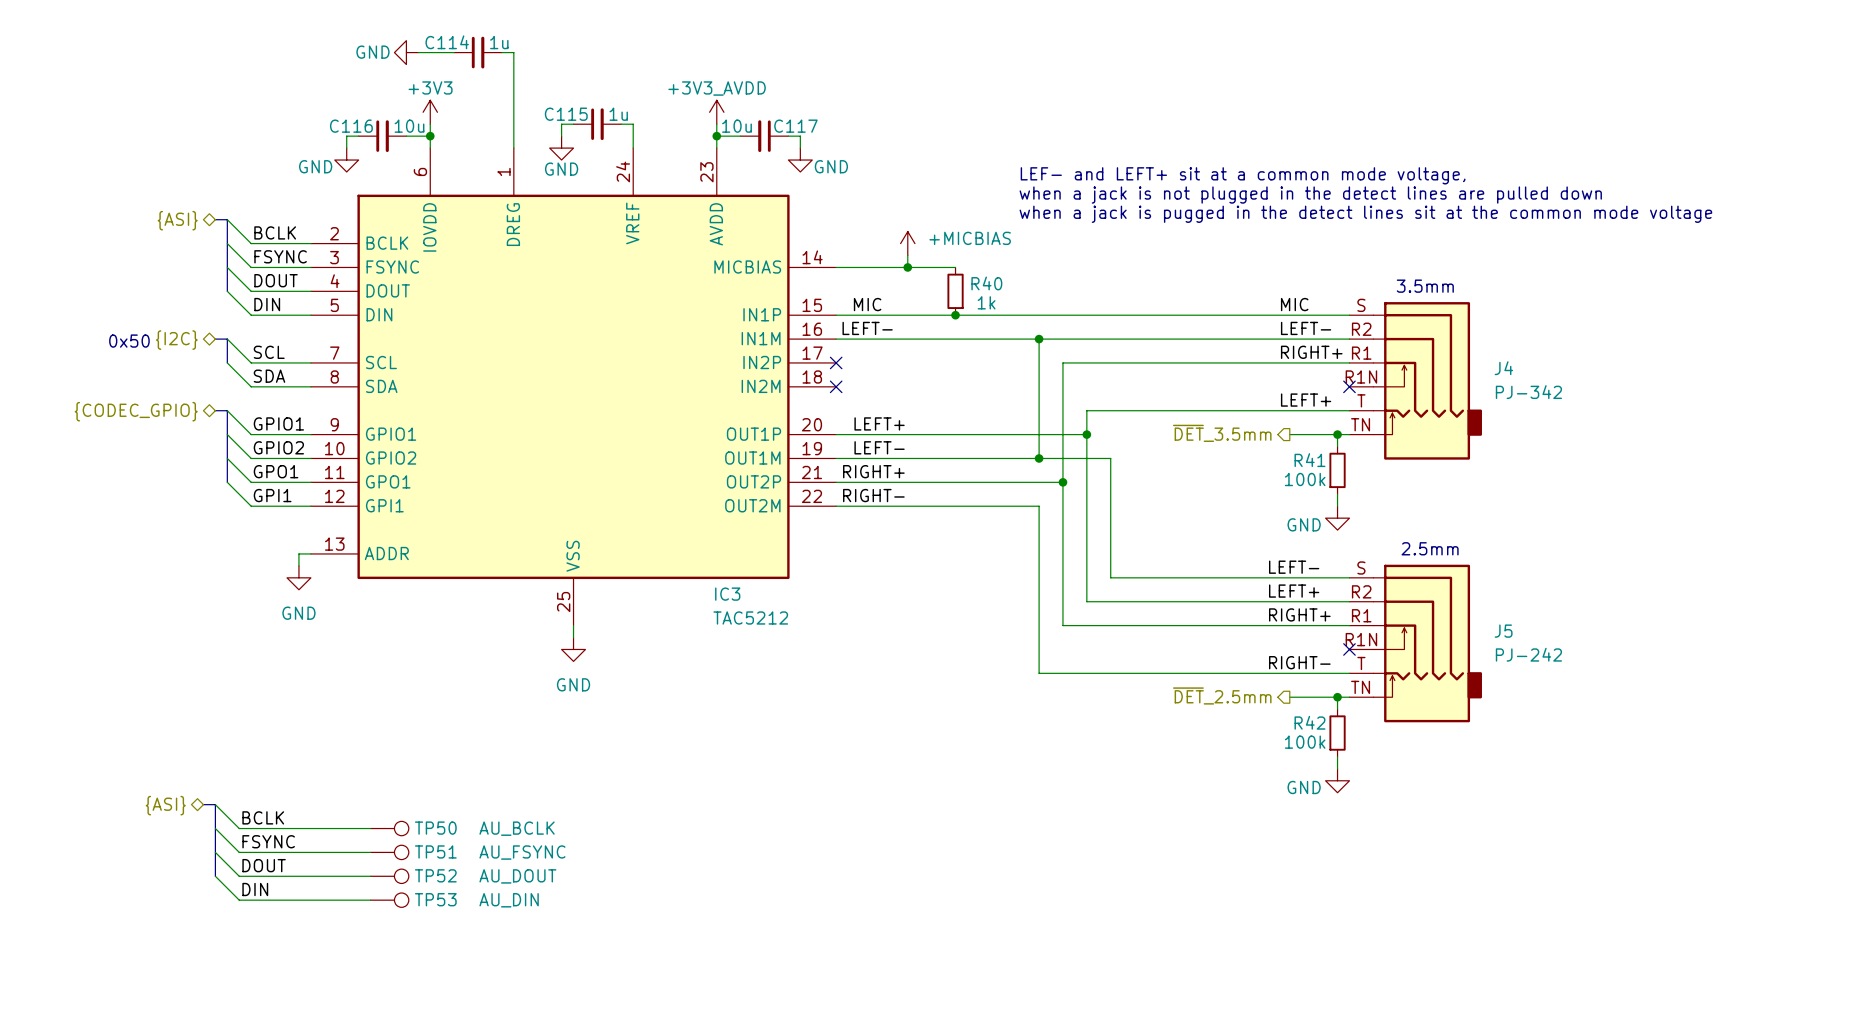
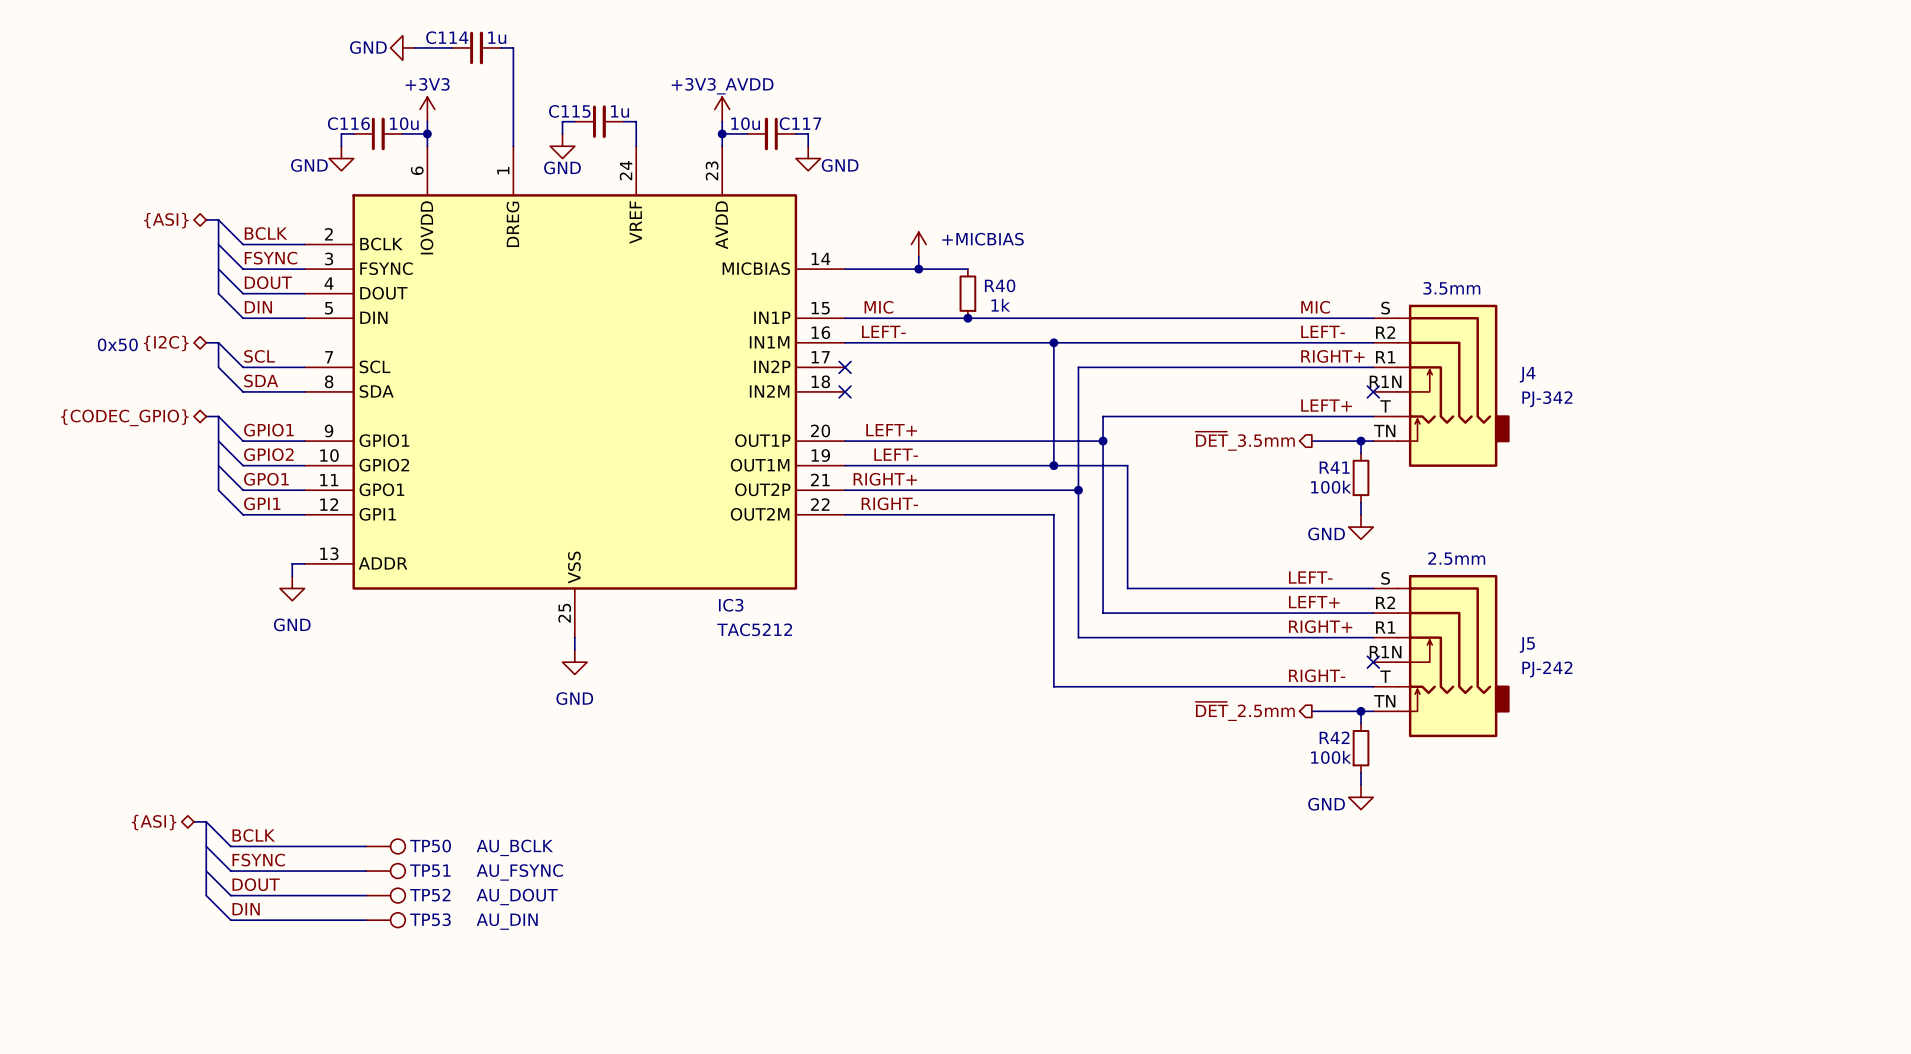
text: LEF- and LEFT+ sit at a common mode voltage, (1243, 175) -> none
text: when a jack is not plugged in the detect lines are pulled down (1310, 195) -> none
text: when a jack is pugged in the detect lines sit at the common mode voltage (1365, 214) -> none

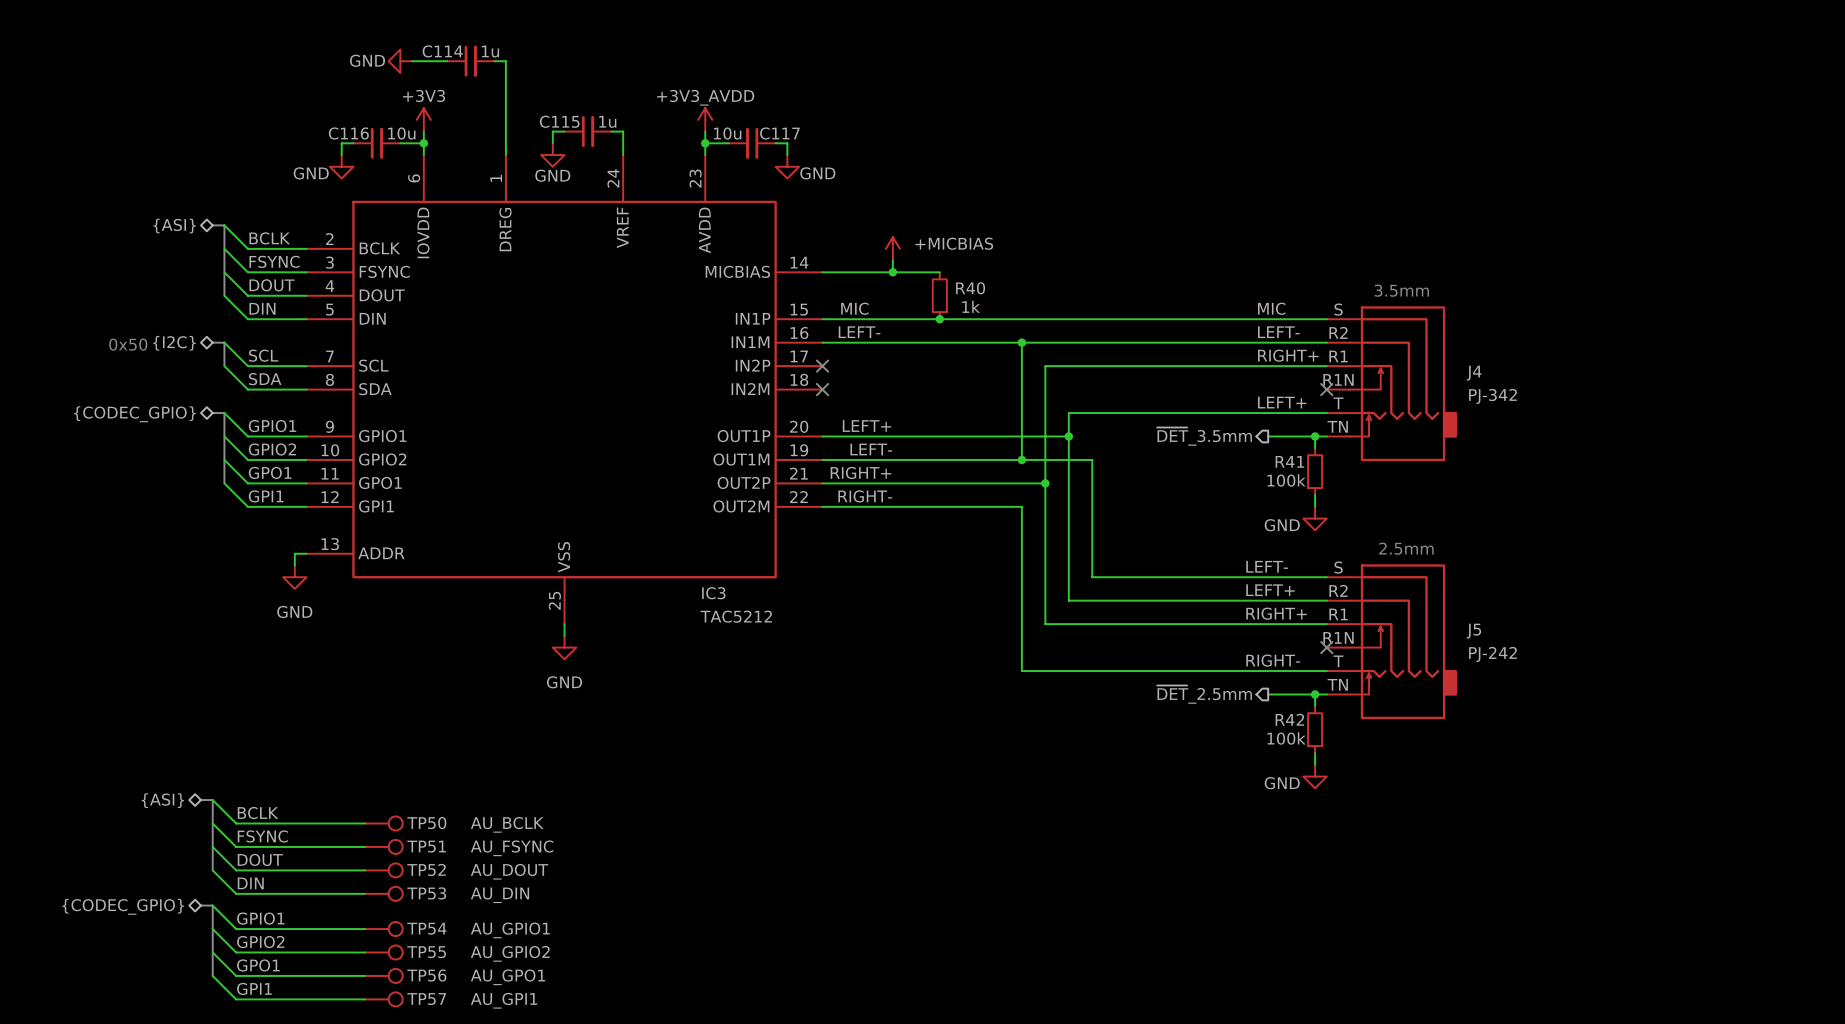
bus: none -> (200, 905) (212, 905) (212, 975)
wire: none -> (212, 905) (236, 929) (365, 929)
hierarchical label: none -> {CODEC_GPIO} (123, 906)
label: none -> GPIO1 (260, 918)
wire: none -> (212, 929) (236, 952) (365, 952)
TP54: none -> AU_GPIO1 (383, 929)
label: none -> GPIO2 (260, 942)
wire: none -> (212, 952) (236, 975) (365, 975)
TP55: none -> AU_GPIO2 (383, 952)
label: none -> GPO1 (258, 965)
wire: none -> (212, 975) (236, 999) (365, 999)
TP56: none -> AU_GPO1 (383, 975)
label: none -> GPI1 (254, 988)
TP57: none -> AU_GPI1 (383, 999)

